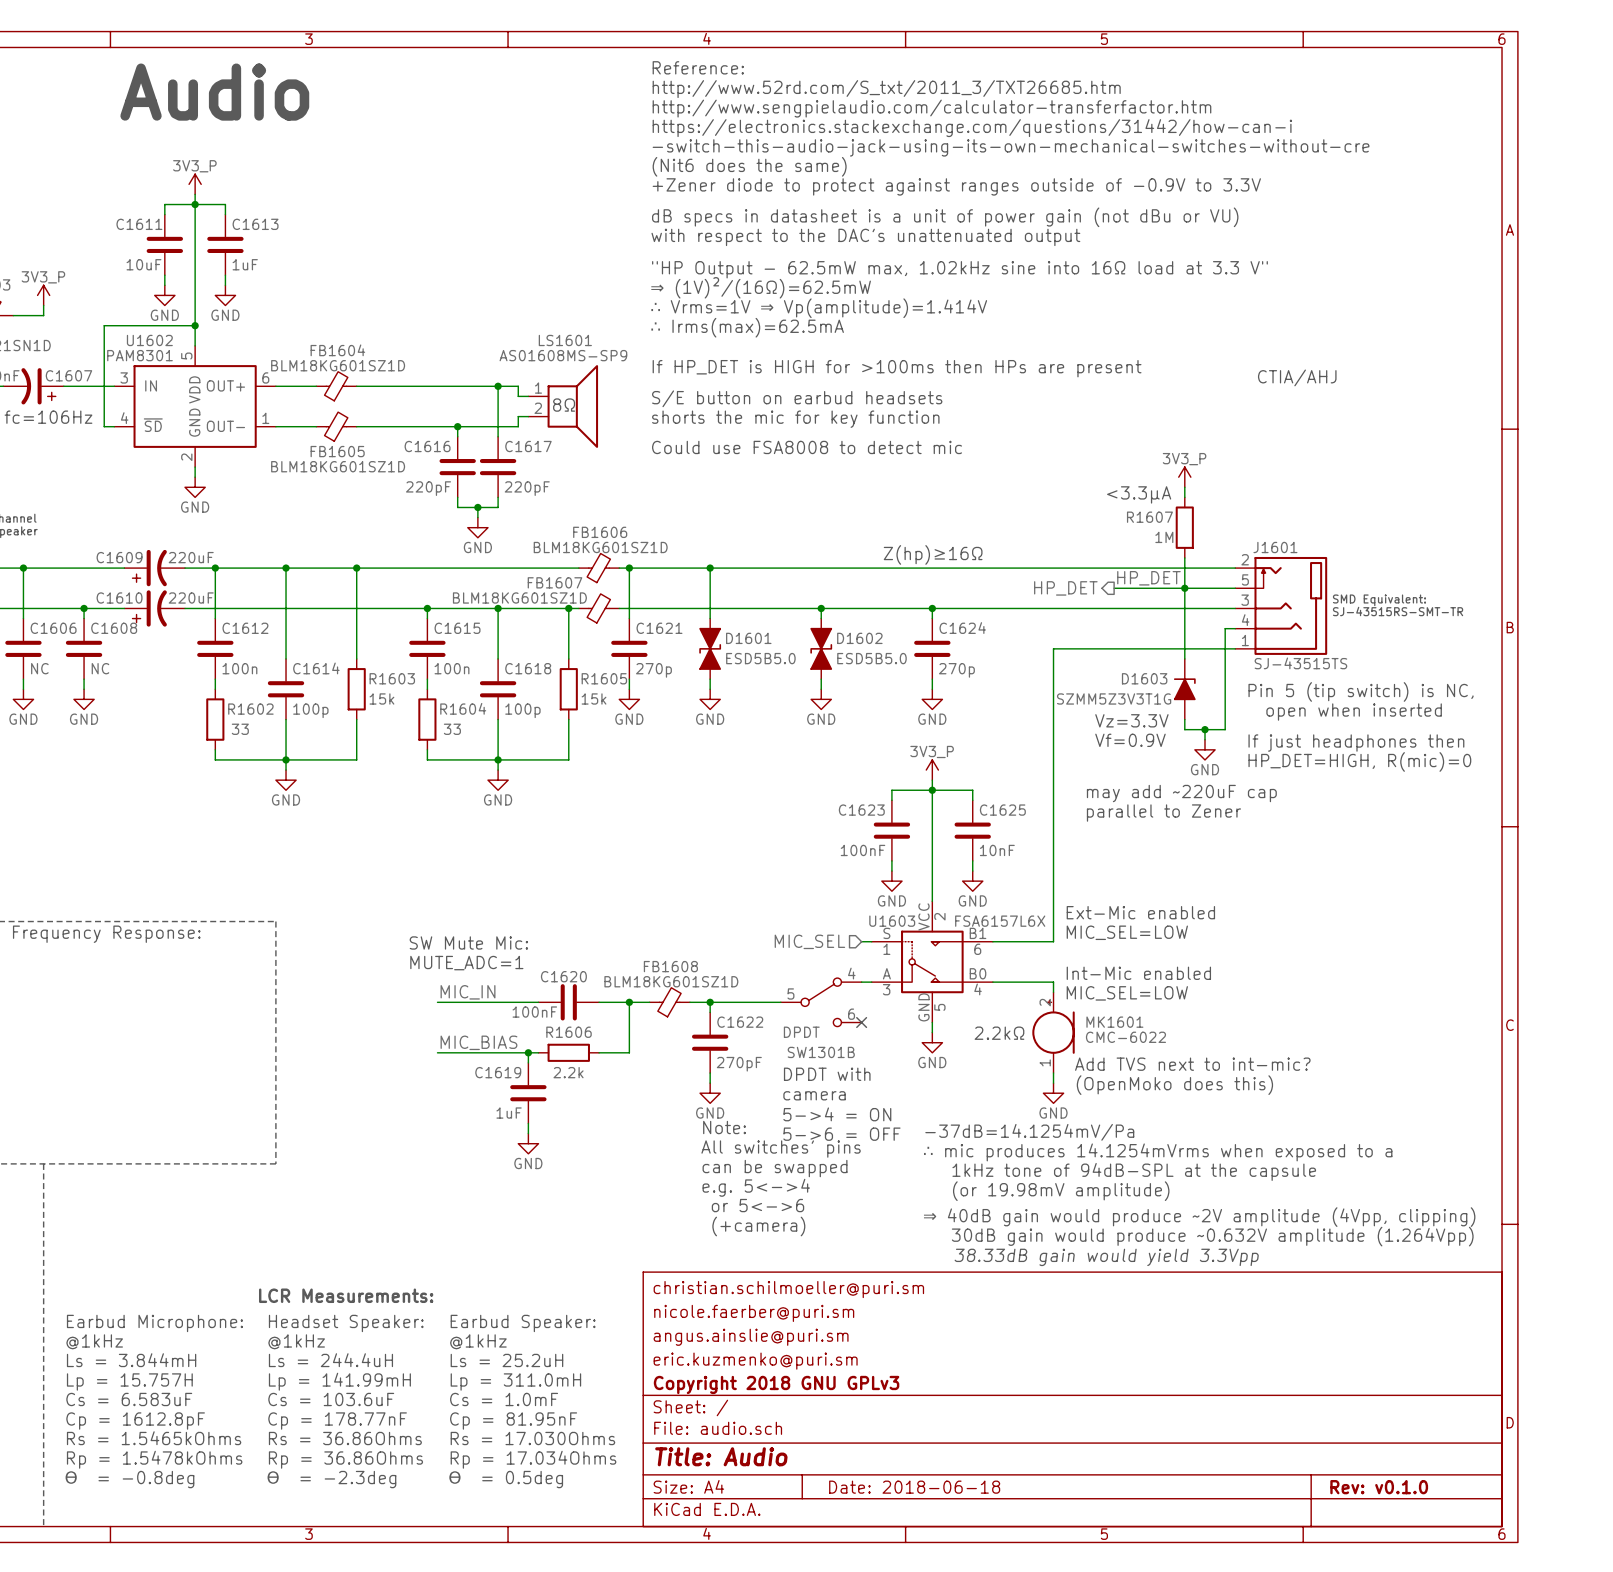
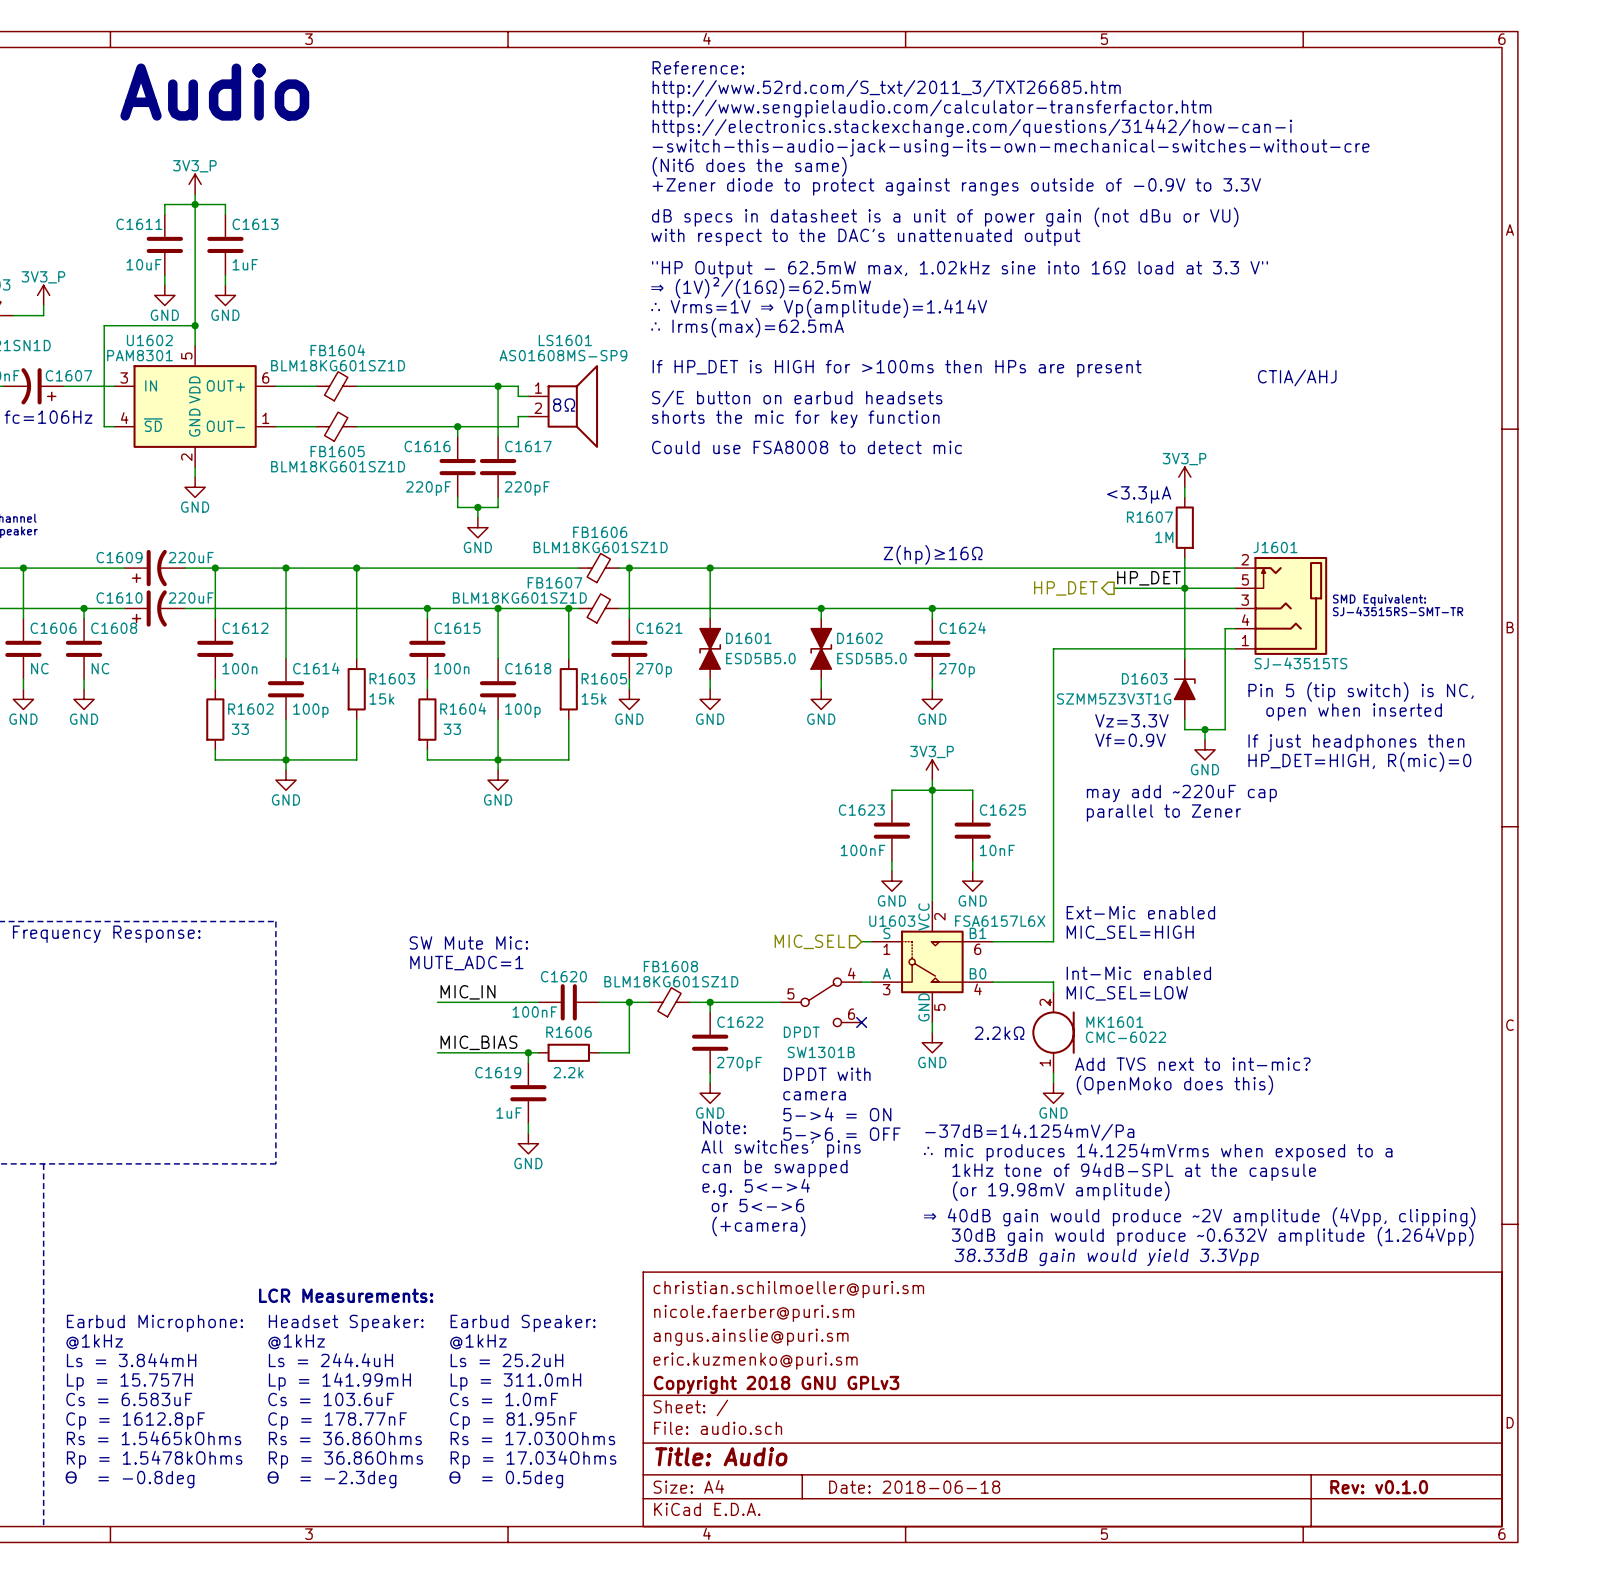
text: MIC_SEL=LOW (1127, 932) -> MIC_SEL=HIGH (1130, 932)

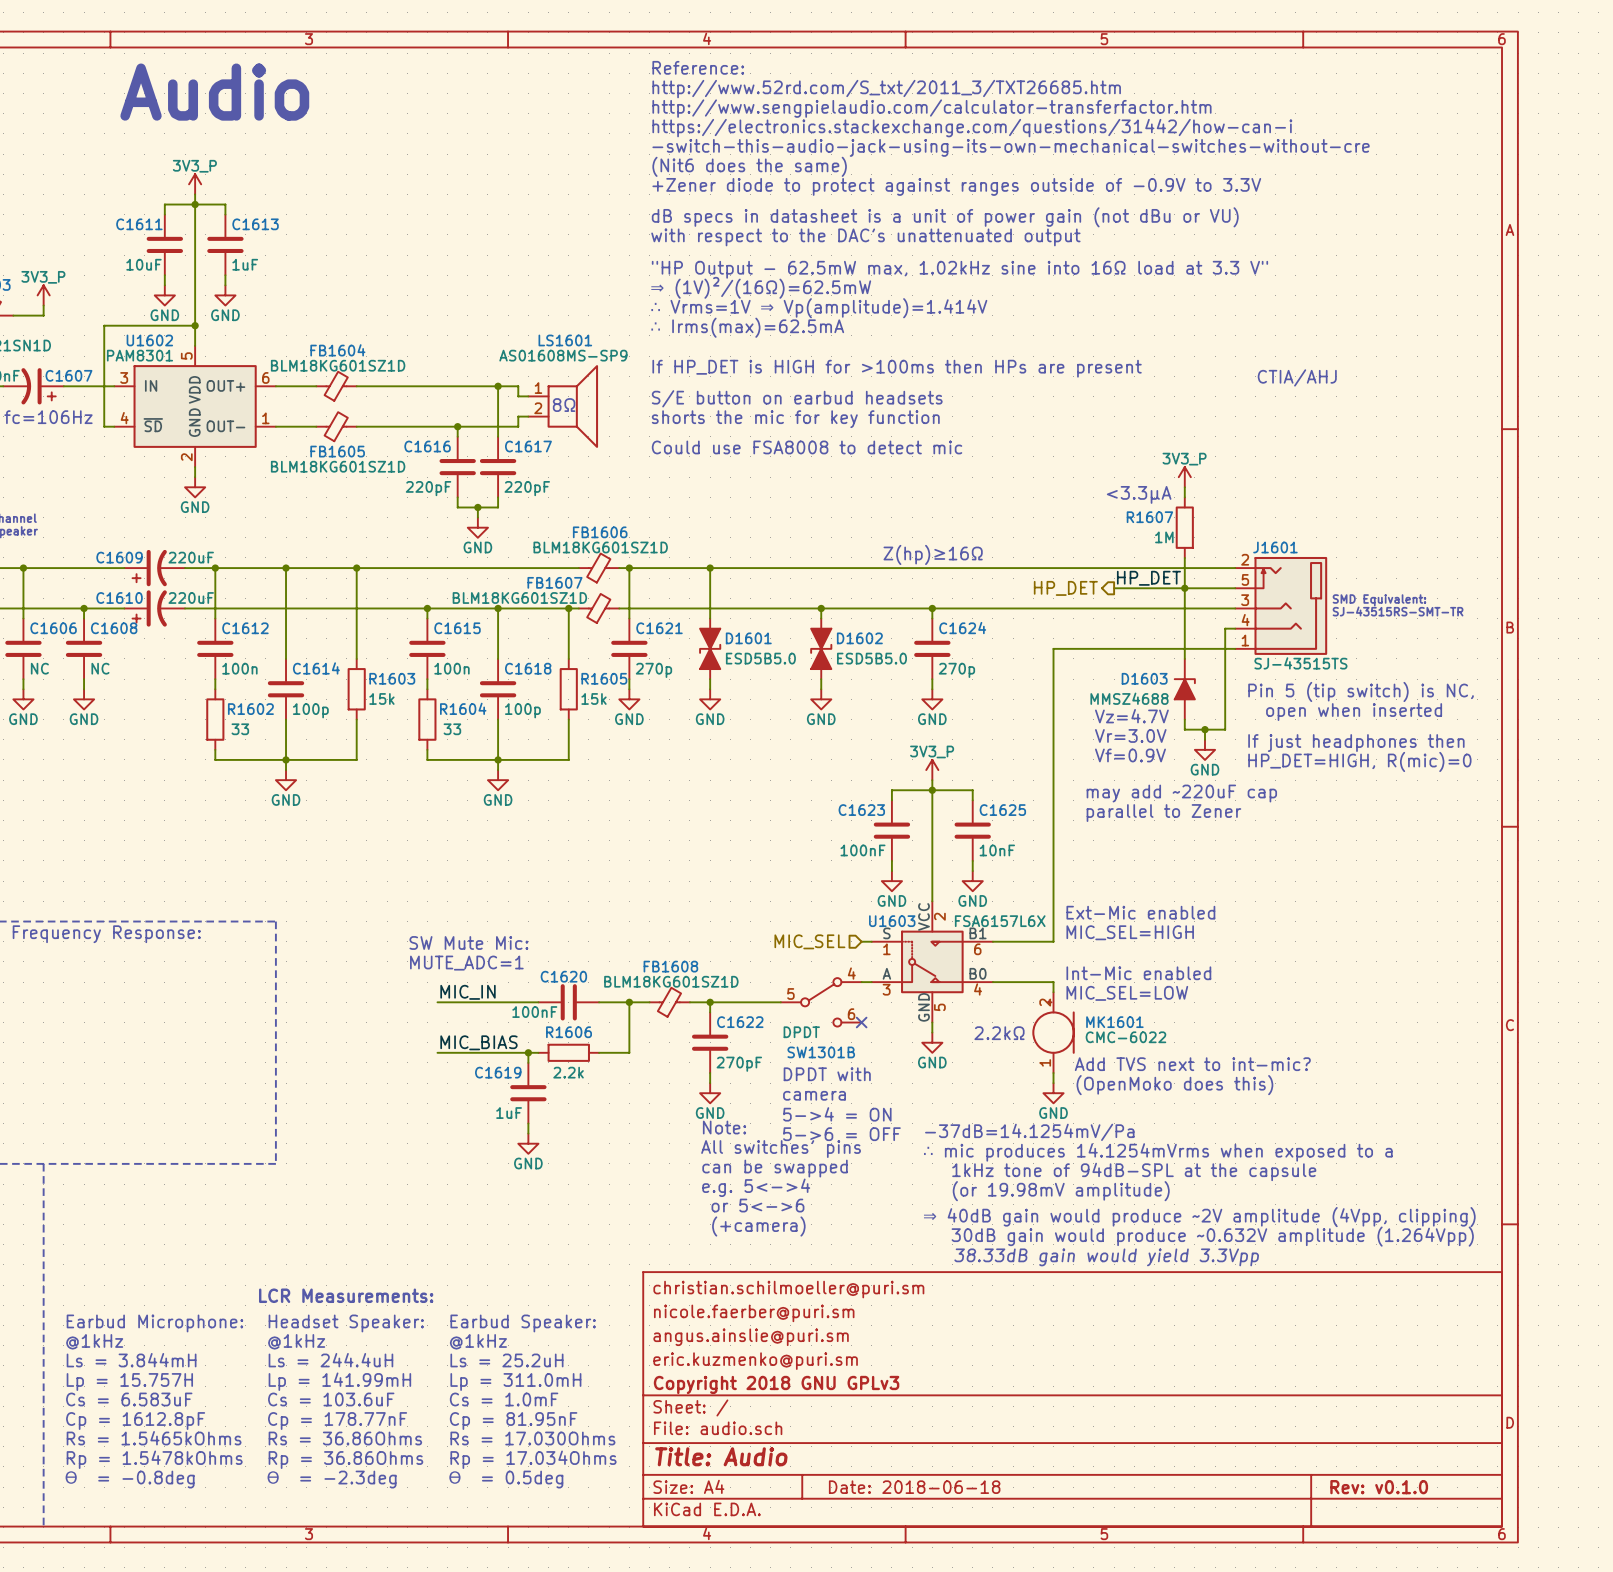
D1603 value: SZMM5Z3V3T1G (1114, 698) -> MMSZ4688 (1129, 698)
text: Vz=3.3V (1131, 720) -> Vz=4.7V (1131, 716)
text: Vf=0.9V (1130, 740) -> Vr=3.0V (1130, 735)
text: none -> Vf=0.9V (1130, 755)

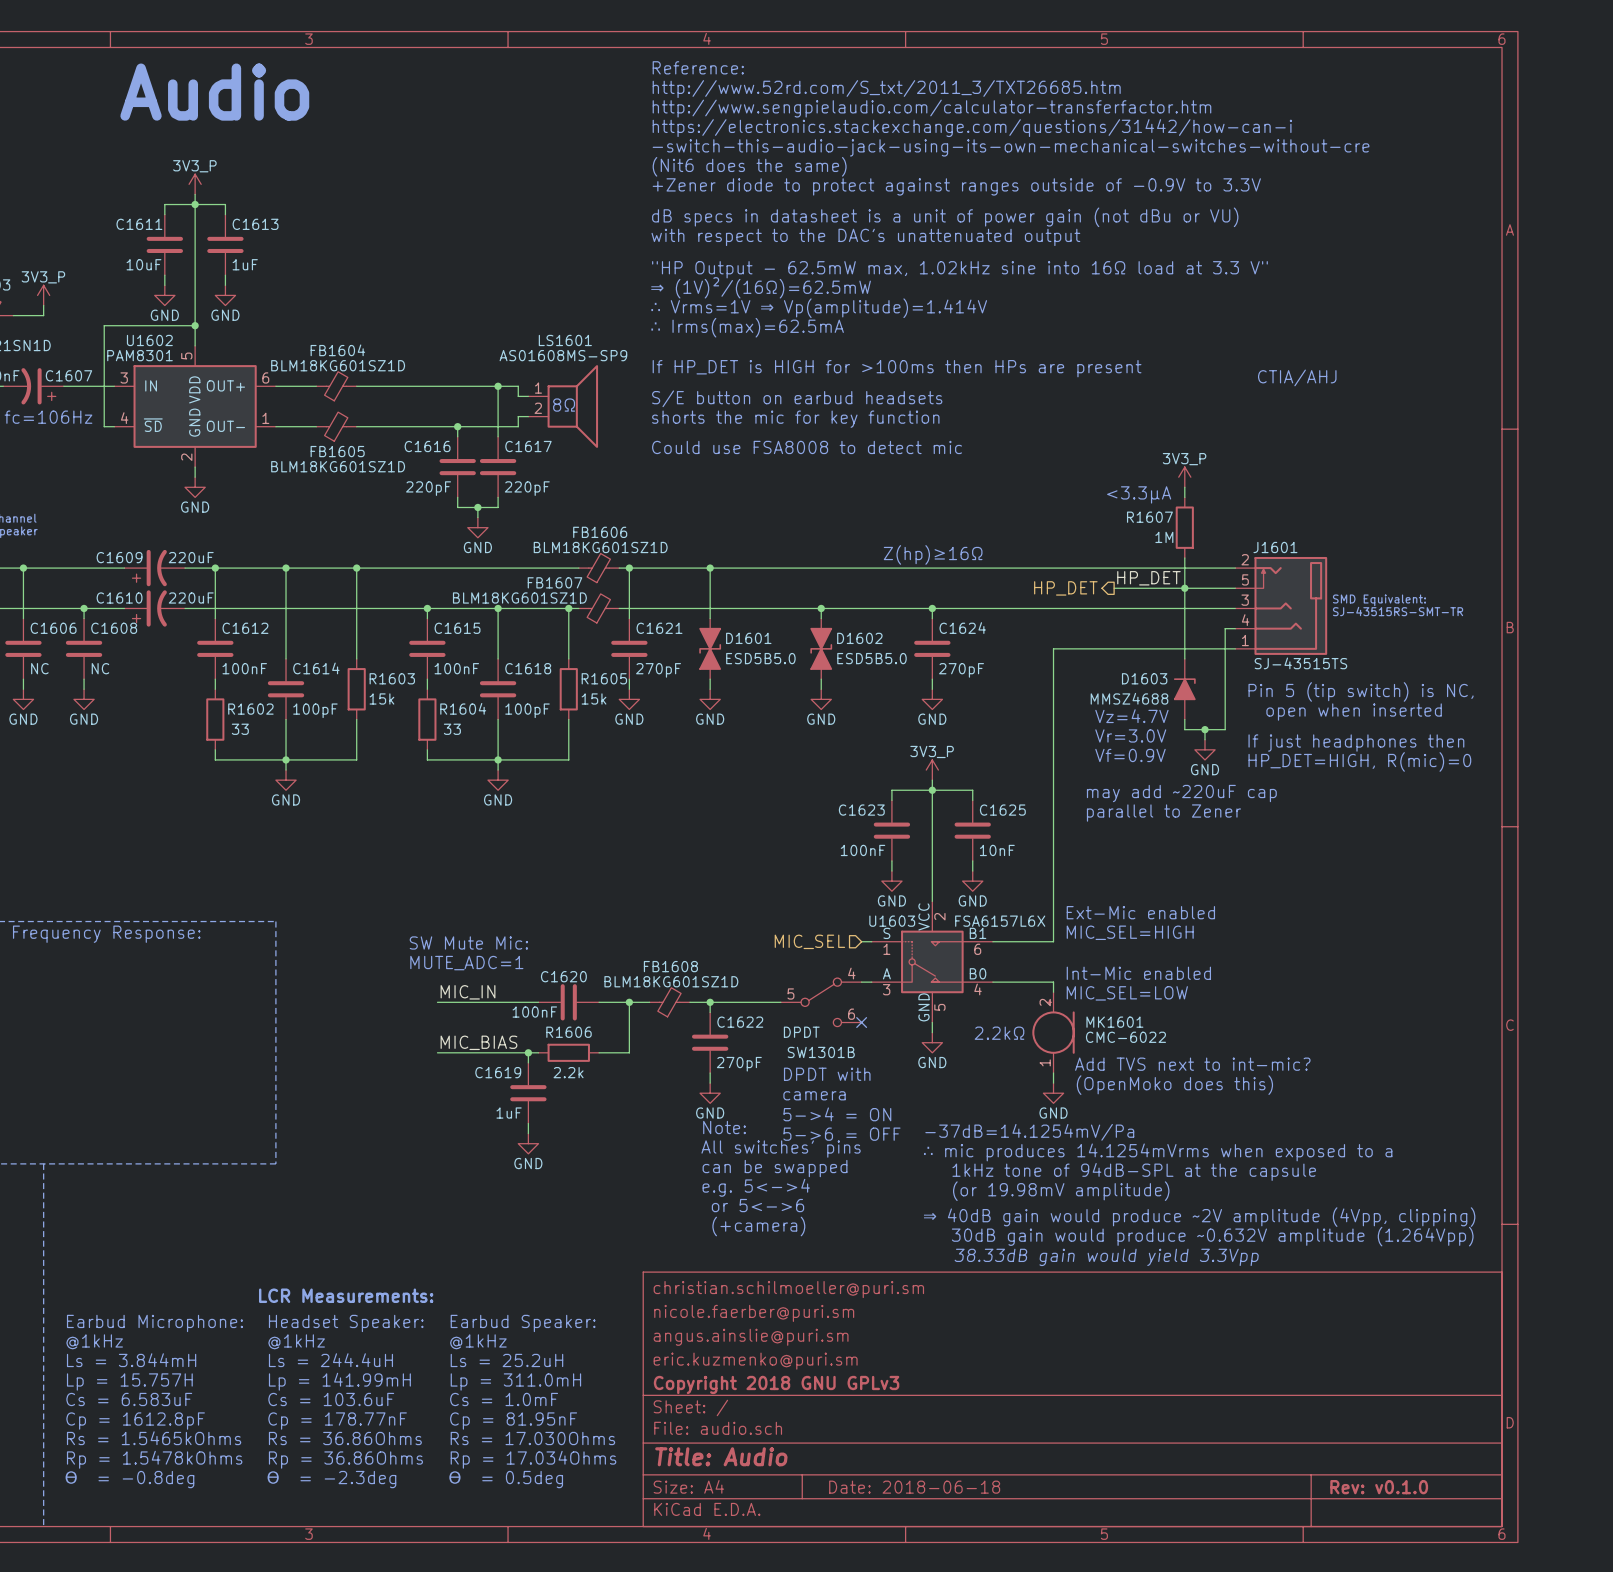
C1612 value: 100n (239, 668) -> 100nF (244, 668)
C1615 value: 100n (451, 668) -> 100nF (456, 668)
C1621 value: 270p (653, 670) -> 270pF (658, 670)
C1624 value: 270p (956, 670) -> 270pF (961, 670)
C1614 value: 100p (310, 710) -> 100pF (315, 710)
C1618 value: 100p (522, 710) -> 100pF (527, 710)

